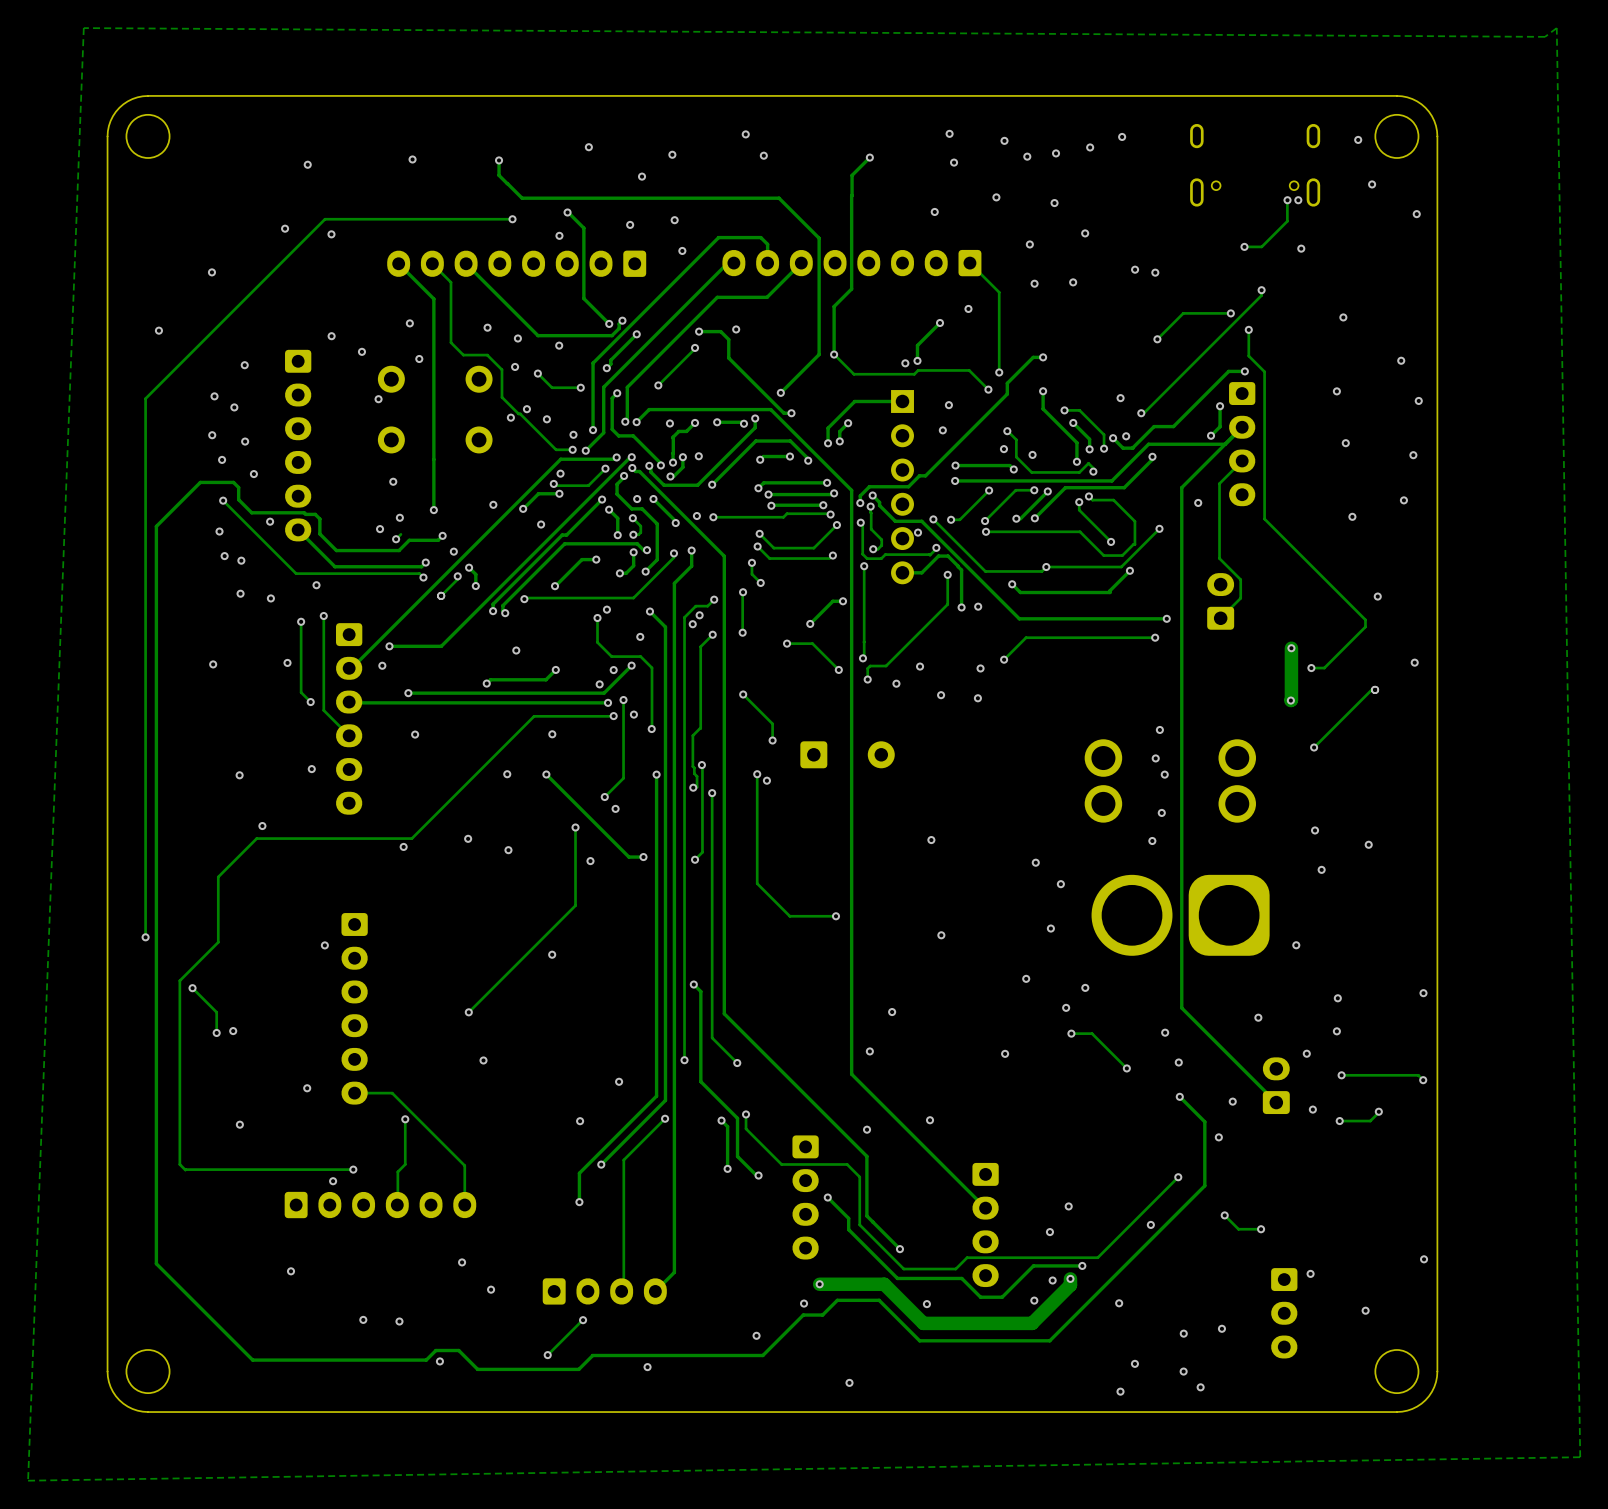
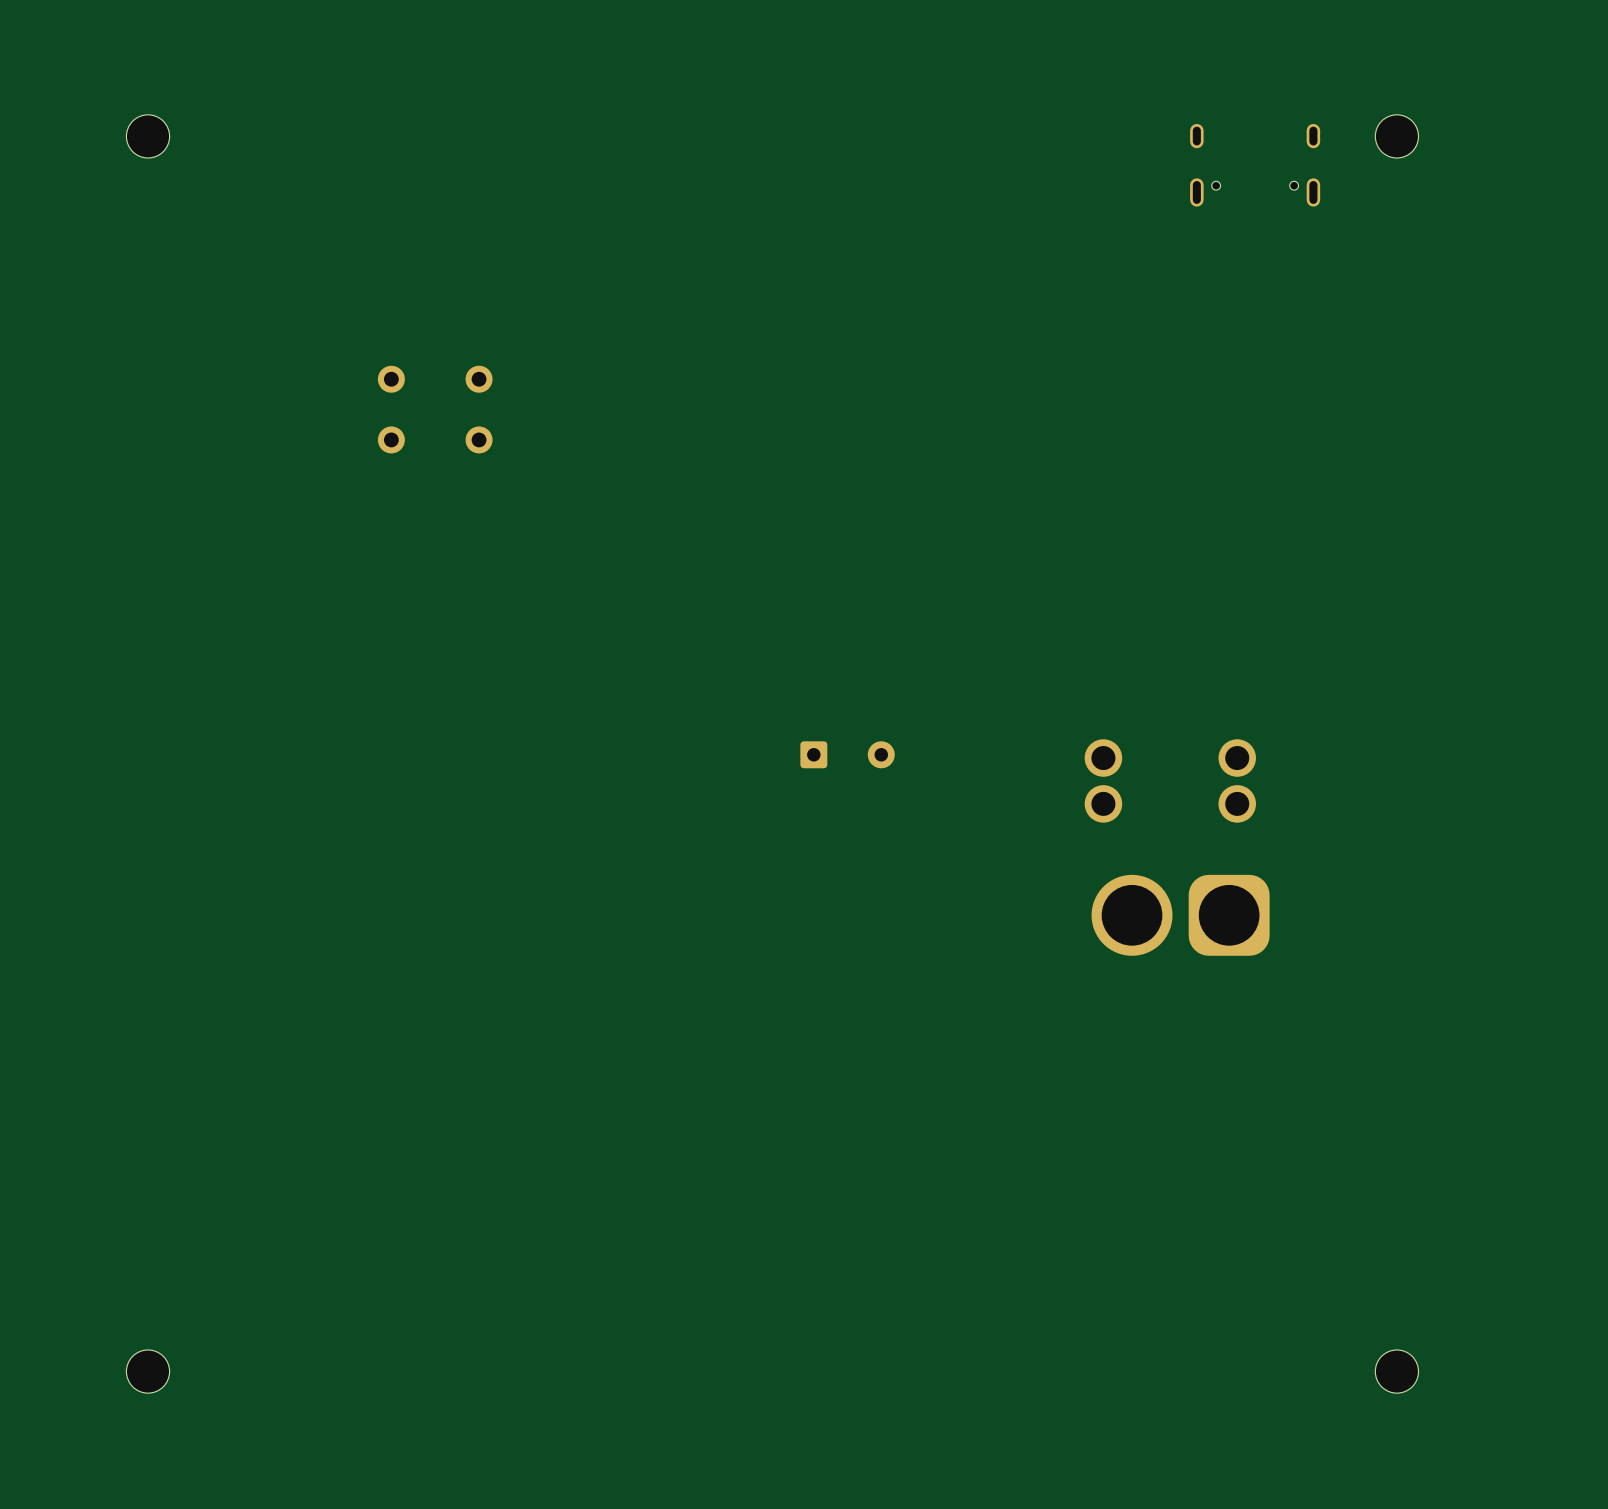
zone outline: (1556, 28) (1580, 1457) (28, 1480) (83, 28) (1545, 36) (1556, 28) -> none
board edge: (1396, 95) (148, 95) (132, 99) (119, 107) (110, 120) (107, 136) (107, 1371) (110, 1387) (119, 1400) (132, 1408) (148, 1412) (1396, 1412) (1412, 1408) (1425, 1400) (1434, 1387) (1437, 1371) (1437, 136) (1434, 120) (1425, 107) (1412, 99) (1396, 95) -> none
via: (949, 133) -> none
via: (745, 134) -> none
via: (1122, 136) -> none
via: (1358, 139) -> none
via: (1004, 140) -> none
via: (588, 147) -> none
via: (1090, 147) -> none
via: (1056, 153) -> none
via: (672, 154) -> none
via: (763, 155) -> none
via: (1027, 156) -> none
track: (869, 157) (852, 175) (851, 288) (834, 306) (834, 354) -> none
via: (869, 157) -> none
via: (412, 159) -> none
track: (499, 160) (499, 175) (507, 183) -> none
via: (499, 160) -> none
via: (954, 162) -> none
via: (307, 164) -> none
via: (642, 176) -> none
track: (507, 183) (522, 198) (779, 198) (819, 238) (819, 354) (780, 392) -> none
via: (1372, 184) -> none
via: (996, 197) -> none
track: (1287, 200) (1287, 221) (1261, 246) (1244, 246) -> none
via: (1287, 200) -> none
via: (1298, 200) -> none
via: (1054, 203) -> none
via: (934, 211) -> none
track: (567, 212) (583, 228) (583, 298) (609, 323) -> none
via: (567, 212) -> none
via: (1416, 214) -> none
track: (512, 219) (325, 219) (145, 398) (145, 937) -> none
via: (512, 219) -> none
via: (674, 220) -> none
via: (630, 224) -> none
via: (285, 228) -> none
via: (1085, 233) -> none
via: (331, 234) -> none
via: (559, 235) -> none
via: (1029, 244) -> none
via: (1244, 246) -> none
via: (1301, 248) -> none
via: (682, 250) -> none
track: (398, 263) (433, 298) (433, 510) -> none
track: (432, 263) (451, 282) (451, 342) (463, 355) (487, 355) (501, 369) (501, 397) (556, 449) (572, 449) -> none
track: (466, 263) (538, 335) (611, 335) (619, 328) (619, 323) (622, 320) -> none
part: (516, 263) -> none
track: (733, 263) (727, 263) (603, 387) (603, 432) (585, 450) -> none
track: (767, 263) (767, 244) (760, 237) (718, 237) (593, 363) (593, 430) -> none
track: (801, 263) (767, 297) (717, 297) (627, 387) (627, 419) (625, 421) -> none
part: (851, 263) -> none
track: (969, 263) (999, 292) (999, 372) -> none
via: (1135, 269) -> none
via: (211, 272) -> none
via: (1155, 272) -> none
via: (1073, 282) -> none
via: (1034, 283) -> none
track: (1261, 290) (1261, 295) (1143, 413) (1141, 413) -> none
via: (1261, 290) -> none
via: (968, 308) -> none
track: (1230, 313) (1183, 313) (1157, 339) -> none
via: (1230, 313) -> none
via: (1343, 317) -> none
via: (622, 320) -> none
track: (940, 322) (917, 345) (917, 360) -> none
via: (940, 322) -> none
via: (409, 323) -> none
via: (609, 323) -> none
via: (487, 327) -> none
via: (736, 329) -> none
track: (1248, 329) (1248, 356) (1264, 371) (1264, 518) (1365, 619) (1365, 626) (1324, 668) (1311, 668) -> none
via: (1248, 329) -> none
via: (158, 330) -> none
track: (699, 331) (720, 331) (728, 339) (728, 358) (783, 413) (791, 413) -> none
via: (699, 331) -> none
track: (636, 334) (610, 360) (610, 364) (606, 368) -> none
via: (636, 334) -> none
via: (331, 336) -> none
via: (517, 338) -> none
via: (1157, 339) -> none
via: (559, 345) -> none
track: (695, 347) (658, 385) -> none
via: (695, 347) -> none
via: (361, 351) -> none
track: (834, 354) (853, 374) (914, 374) (918, 370) (969, 370) (988, 389) -> none
via: (834, 354) -> none
track: (1043, 357) (1033, 357) (1007, 383) (1007, 394) (925, 475) (919, 475) (908, 486) (869, 486) (860, 495) (860, 503) -> none
via: (1043, 357) -> none
via: (419, 359) -> none
via: (917, 360) -> none
via: (1401, 360) -> none
via: (905, 363) -> none
via: (244, 365) -> none
via: (515, 366) -> none
via: (606, 368) -> none
track: (1244, 371) (1228, 371) (1173, 426) (1154, 426) (1132, 448) (1123, 448) (1113, 438) -> none
via: (1244, 371) -> none
via: (999, 372) -> none
track: (537, 373) (552, 387) (580, 387) -> none
via: (537, 373) -> none
via: (658, 385) -> none
via: (580, 387) -> none
via: (988, 389) -> none
track: (1043, 391) (1043, 408) (1076, 442) (1076, 461) -> none
via: (1043, 391) -> none
via: (1336, 391) -> none
via: (780, 392) -> none
track: (617, 393) (612, 398) (612, 429) (618, 435) (633, 435) (660, 465) -> none
via: (617, 393) -> none
via: (214, 396) -> none
via: (1120, 398) -> none
via: (378, 399) -> none
via: (1418, 400) -> none
track: (902, 401) (854, 401) (828, 428) (828, 443) -> none
via: (948, 405) -> none
track: (1220, 406) (1220, 426) (1211, 435) -> none
via: (1220, 406) -> none
via: (234, 407) -> none
via: (526, 409) -> none
track: (1064, 410) (1079, 410) (1104, 434) (1104, 448) -> none
via: (1064, 410) -> none
via: (791, 413) -> none
via: (1141, 413) -> none
via: (510, 417) -> none
track: (755, 418) (755, 427) (697, 485) (664, 485) (650, 472) (649, 465) -> none
via: (755, 418) -> none
via: (546, 419) -> none
via: (625, 421) -> none
track: (636, 422) (649, 409) (770, 409) (851, 490) (851, 1074) (985, 1208) -> none
via: (636, 422) -> none
track: (695, 422) (686, 431) (678, 431) (673, 437) (673, 462) -> none
via: (695, 422) -> none
track: (717, 422) (744, 423) -> none
via: (717, 422) -> none
track: (1073, 422) (1089, 439) (1089, 449) -> none
via: (1073, 422) -> none
via: (669, 423) -> none
via: (744, 423) -> none
track: (848, 423) (839, 431) (839, 441) -> none
via: (848, 423) -> none
track: (1242, 427) (1181, 487) (1181, 1008) (1276, 1102) -> none
via: (593, 430) -> none
via: (942, 430) -> none
track: (1007, 431) (1016, 439) (1016, 457) (1031, 472) (1079, 472) (1088, 463) (1093, 468) (1093, 471) -> none
via: (1007, 431) -> none
via: (573, 434) -> none
via: (212, 435) -> none
via: (1211, 435) -> none
via: (1126, 436) -> none
via: (1113, 438) -> none
via: (245, 441) -> none
via: (839, 441) -> none
via: (828, 443) -> none
via: (1345, 443) -> none
track: (1225, 444) (1148, 444) (1111, 480) (955, 480) -> none
part: (1242, 444) -> none
part: (298, 445) -> none
via: (1104, 448) -> none
via: (572, 449) -> none
via: (1003, 449) -> none
via: (1089, 449) -> none
via: (585, 450) -> none
via: (1032, 454) -> none
via: (1413, 455) -> none
via: (698, 456) -> none
track: (790, 456) (763, 456) (760, 459) -> none
via: (790, 456) -> none
track: (1152, 456) (1152, 459) (1124, 487) (1065, 487) (1034, 518) -> none
via: (1152, 456) -> none
track: (616, 457) (614, 459) (560, 459) (351, 668) (349, 668) -> none
via: (616, 457) -> none
track: (631, 457) (441, 646) (389, 646) -> none
via: (631, 457) -> none
track: (682, 457) (682, 467) (673, 476) (670, 476) -> none
via: (682, 457) -> none
via: (222, 459) -> none
via: (760, 459) -> none
track: (808, 460) (790, 441) (755, 441) (712, 484) -> none
via: (808, 460) -> none
track: (1242, 460) (1219, 483) (1219, 558) (1240, 579) (1240, 598) (1220, 618) -> none
via: (1076, 461) -> none
via: (673, 462) -> none
via: (649, 465) -> none
via: (660, 465) -> none
track: (955, 465) (1009, 465) (1013, 469) -> none
via: (955, 465) -> none
track: (605, 468) (588, 485) (555, 485) (553, 483) -> none
via: (605, 468) -> none
track: (632, 468) (635, 471) (639, 471) (724, 556) (724, 1013) (866, 1156) (866, 1216) (899, 1249) -> none
via: (632, 468) -> none
via: (1013, 469) -> none
via: (1093, 471) -> none
via: (560, 473) -> none
via: (253, 474) -> none
track: (624, 475) (617, 484) (617, 494) (631, 508) (642, 508) (657, 523) (657, 559) (645, 571) -> none
via: (624, 475) -> none
via: (670, 476) -> none
via: (955, 480) -> none
via: (393, 481) -> none
track: (827, 482) (763, 482) (758, 488) -> none
via: (827, 482) -> none
via: (553, 483) -> none
via: (712, 484) -> none
part: (902, 487) -> none
via: (758, 488) -> none
track: (989, 490) (959, 519) (951, 519) -> none
via: (989, 490) -> none
track: (1034, 490) (1015, 490) (985, 521) -> none
via: (1034, 490) -> none
track: (1047, 491) (1020, 518) (1016, 518) -> none
via: (1047, 491) -> none
track: (559, 493) (538, 493) (523, 508) -> none
via: (559, 493) -> none
track: (834, 493) (768, 494) -> none
via: (834, 493) -> none
via: (768, 494) -> none
track: (872, 495) (895, 521) (921, 521) (1019, 618) (1166, 618) -> none
via: (872, 495) -> none
track: (1088, 496) (1092, 500) (1113, 500) (1134, 521) (1134, 544) (1122, 555) (1103, 555) (1080, 531) (986, 531) -> none
via: (1088, 496) -> none
track: (602, 499) (566, 535) (562, 535) (493, 604) (493, 611) -> none
via: (602, 499) -> none
via: (637, 499) -> none
track: (653, 499) (675, 523) -> none
via: (653, 499) -> none
track: (223, 500) (296, 573) (419, 573) (423, 577) -> none
via: (223, 500) -> none
via: (1403, 500) -> none
track: (1079, 502) (1079, 510) (1111, 541) -> none
via: (1079, 502) -> none
via: (1198, 502) -> none
via: (860, 503) -> none
via: (493, 504) -> none
via: (771, 505) -> none
track: (823, 505) (771, 505) -> none
via: (823, 505) -> none
track: (870, 506) (871, 529) (881, 539) (881, 545) (877, 549) (873, 549) -> none
via: (870, 506) -> none
via: (523, 508) -> none
track: (609, 509) (617, 518) (617, 535) -> none
via: (609, 509) -> none
via: (433, 510) -> none
track: (830, 514) (787, 513) (783, 517) (713, 517) -> none
via: (830, 514) -> none
via: (696, 516) -> none
via: (1352, 516) -> none
via: (399, 517) -> none
via: (713, 517) -> none
track: (632, 518) (640, 526) (640, 532) (638, 534) (633, 534) -> none
via: (632, 518) -> none
via: (1016, 518) -> none
via: (1034, 518) -> none
track: (933, 519) (985, 571) (1041, 571) (1046, 567) (1121, 567) (1159, 528) -> none
via: (933, 519) -> none
via: (951, 519) -> none
via: (270, 521) -> none
via: (985, 521) -> none
track: (860, 522) (862, 524) (862, 554) (867, 558) (881, 558) (885, 554) (930, 555) (936, 547) -> none
via: (860, 522) -> none
via: (675, 523) -> none
via: (541, 524) -> none
track: (836, 525) (813, 548) (773, 548) (759, 533) -> none
via: (836, 525) -> none
via: (1159, 528) -> none
track: (298, 529) (334, 566) (421, 566) (425, 562) -> none
via: (380, 529) -> none
via: (219, 531) -> none
via: (986, 531) -> none
via: (918, 532) -> none
via: (759, 533) -> none
track: (400, 534) (396, 539) -> none
via: (633, 534) -> none
track: (442, 535) (438, 540) (409, 540) (399, 550) (336, 550) (319, 533) (319, 518) (315, 514) (251, 512) (238, 499) (238, 487) (233, 482) (200, 482) (156, 526) (156, 1263) (252, 1360) (426, 1360) (435, 1350) (458, 1350) (477, 1369) (578, 1369) (592, 1355) (762, 1355) (803, 1315) (822, 1315) (837, 1300) (879, 1300) (919, 1340) (1049, 1340) (1204, 1185) (1204, 1121) (1179, 1096) -> none
via: (442, 535) -> none
via: (617, 535) -> none
via: (396, 539) -> none
via: (1111, 541) -> none
track: (757, 546) (769, 558) (829, 558) -> none
via: (757, 546) -> none
via: (936, 547) -> none
via: (873, 549) -> none
track: (647, 550) (643, 550) (637, 543) (564, 543) (502, 605) (502, 610) (505, 613) -> none
via: (647, 550) -> none
track: (691, 550) (691, 566) (674, 583) (674, 1272) (655, 1291) -> none
via: (691, 550) -> none
via: (453, 551) -> none
track: (633, 552) (633, 565) (626, 573) (619, 573) -> none
via: (633, 552) -> none
track: (673, 553) (673, 557) (633, 598) (524, 599) -> none
via: (673, 553) -> none
via: (832, 555) -> none
via: (224, 556) -> none
track: (596, 559) (581, 559) (555, 586) -> none
via: (596, 559) -> none
via: (241, 560) -> none
via: (425, 562) -> none
track: (751, 562) (751, 574) (760, 582) -> none
via: (751, 562) -> none
track: (864, 566) (862, 658) -> none
via: (864, 566) -> none
track: (469, 567) (475, 574) (475, 586) -> none
via: (469, 567) -> none
via: (1046, 567) -> none
track: (1129, 570) (1109, 592) (1020, 592) (1012, 584) -> none
via: (1129, 570) -> none
via: (645, 571) -> none
track: (902, 572) (921, 572) (938, 556) (948, 556) (961, 570) (961, 607) -> none
via: (619, 573) -> none
track: (947, 574) (947, 604) (886, 666) (870, 666) (867, 668) (867, 679) -> none
via: (947, 574) -> none
track: (457, 576) (457, 579) (441, 595) -> none
via: (457, 576) -> none
via: (423, 577) -> none
via: (760, 582) -> none
via: (1012, 584) -> none
via: (316, 585) -> none
via: (475, 586) -> none
via: (555, 586) -> none
track: (743, 592) (742, 632) -> none
via: (743, 592) -> none
via: (240, 593) -> none
via: (441, 595) -> none
via: (1377, 596) -> none
via: (270, 598) -> none
via: (524, 599) -> none
track: (714, 599) (707, 606) (695, 606) (684, 617) (684, 1060) -> none
via: (714, 599) -> none
track: (843, 601) (832, 601) (810, 623) -> none
via: (843, 601) -> none
part: (1220, 601) -> none
via: (978, 606) -> none
via: (961, 607) -> none
via: (606, 609) -> none
via: (493, 611) -> none
track: (649, 611) (665, 627) (665, 1100) (601, 1164) -> none
via: (649, 611) -> none
via: (505, 613) -> none
track: (323, 615) (323, 710) (349, 735) -> none
via: (323, 615) -> none
via: (699, 615) -> none
track: (597, 618) (597, 642) (611, 656) (640, 656) (652, 667) (651, 729) -> none
via: (597, 618) -> none
via: (1166, 618) -> none
track: (301, 621) (301, 692) (310, 702) -> none
via: (301, 621) -> none
via: (810, 623) -> none
via: (692, 624) -> none
via: (742, 632) -> none
track: (712, 634) (700, 646) (700, 728) (692, 735) (692, 766) (697, 776) (697, 787) (693, 787) -> none
via: (712, 634) -> none
via: (640, 636) -> none
track: (1155, 637) (1026, 637) (1004, 659) -> none
via: (1155, 637) -> none
track: (787, 643) (812, 643) (838, 669) -> none
via: (787, 643) -> none
via: (389, 646) -> none
track: (1291, 648) (1290, 700) -> none
via: (1291, 648) -> none
via: (516, 650) -> none
via: (862, 658) -> none
via: (1004, 659) -> none
via: (287, 662) -> none
via: (1414, 662) -> none
via: (213, 664) -> none
via: (382, 665) -> none
track: (631, 665) (604, 693) (408, 693) -> none
via: (631, 665) -> none
via: (920, 666) -> none
via: (980, 668) -> none
via: (1311, 668) -> none
track: (555, 669) (545, 679) (490, 679) (486, 683) -> none
via: (555, 669) -> none
via: (838, 669) -> none
via: (613, 670) -> none
via: (867, 679) -> none
via: (486, 683) -> none
via: (896, 683) -> none
via: (599, 684) -> none
track: (1375, 689) (1371, 689) (1314, 747) -> none
via: (1375, 689) -> none
via: (408, 693) -> none
track: (743, 694) (772, 723) (772, 740) -> none
via: (743, 694) -> none
via: (941, 695) -> none
via: (977, 698) -> none
track: (623, 700) (623, 778) (604, 797) -> none
via: (623, 700) -> none
via: (1290, 700) -> none
via: (310, 702) -> none
track: (349, 702) (608, 702) -> none
via: (608, 702) -> none
via: (633, 714) -> none
track: (613, 716) (534, 716) (411, 838) (256, 838) (218, 877) (218, 942) (179, 980) (179, 1164) (185, 1170) (353, 1169) -> none
via: (613, 716) -> none
part: (349, 718) -> none
via: (651, 729) -> none
via: (1159, 729) -> none
via: (415, 734) -> none
via: (552, 734) -> none
via: (772, 740) -> none
via: (1314, 747) -> none
via: (1155, 758) -> none
track: (701, 765) (702, 852) (695, 859) -> none
via: (701, 765) -> none
via: (311, 769) -> none
via: (507, 774) -> none
track: (546, 774) (628, 857) (643, 857) -> none
via: (546, 774) -> none
track: (656, 774) (656, 1096) (579, 1173) (579, 1202) -> none
via: (656, 774) -> none
track: (757, 774) (757, 883) (789, 916) (836, 916) -> none
via: (757, 774) -> none
via: (1164, 774) -> none
via: (239, 775) -> none
via: (766, 780) -> none
via: (693, 787) -> none
track: (712, 793) (712, 1037) (737, 1063) -> none
via: (712, 793) -> none
via: (604, 797) -> none
via: (615, 808) -> none
via: (1161, 812) -> none
via: (262, 826) -> none
track: (575, 827) (575, 905) (468, 1012) -> none
via: (575, 827) -> none
via: (1315, 830) -> none
via: (468, 838) -> none
via: (931, 840) -> none
via: (1152, 840) -> none
via: (1368, 844) -> none
via: (403, 846) -> none
via: (508, 850) -> none
via: (643, 857) -> none
via: (695, 859) -> none
via: (590, 861) -> none
via: (1035, 862) -> none
via: (1321, 869) -> none
via: (1060, 884) -> none
via: (836, 916) -> none
via: (1050, 928) -> none
via: (941, 935) -> none
via: (145, 937) -> none
via: (324, 945) -> none
via: (1296, 945) -> none
via: (552, 954) -> none
via: (1026, 978) -> none
track: (693, 984) (700, 991) (700, 1081) (737, 1118) (737, 1156) (758, 1175) -> none
via: (693, 984) -> none
via: (1085, 987) -> none
track: (192, 988) (216, 1012) (216, 1032) -> none
via: (192, 988) -> none
via: (1423, 993) -> none
via: (1337, 998) -> none
via: (1066, 1007) -> none
part: (354, 1008) -> none
via: (468, 1012) -> none
via: (892, 1012) -> none
via: (1258, 1017) -> none
via: (233, 1031) -> none
via: (1336, 1031) -> none
via: (216, 1032) -> none
via: (1165, 1032) -> none
track: (1071, 1033) (1092, 1033) (1126, 1068) -> none
via: (1071, 1033) -> none
via: (869, 1051) -> none
via: (1005, 1053) -> none
via: (1306, 1053) -> none
via: (483, 1060) -> none
via: (684, 1060) -> none
via: (1178, 1062) -> none
via: (737, 1063) -> none
via: (1126, 1068) -> none
track: (1341, 1075) (1418, 1075) (1423, 1080) -> none
via: (1341, 1075) -> none
via: (1423, 1080) -> none
via: (619, 1081) -> none
part: (1276, 1085) -> none
via: (307, 1088) -> none
track: (354, 1093) (392, 1093) (464, 1165) (464, 1205) -> none
via: (1179, 1096) -> none
via: (1232, 1101) -> none
via: (1312, 1109) -> none
track: (1378, 1111) (1370, 1121) (1339, 1121) -> none
via: (1378, 1111) -> none
track: (746, 1114) (746, 1128) (781, 1164) (847, 1164) (859, 1177) (859, 1224) (903, 1269) (955, 1269) (967, 1257) (1097, 1257) (1178, 1177) -> none
via: (746, 1114) -> none
track: (665, 1118) (623, 1160) (623, 1292) -> none
via: (665, 1118) -> none
track: (405, 1119) (405, 1164) (397, 1171) (397, 1205) -> none
via: (405, 1119) -> none
track: (721, 1120) (727, 1126) (727, 1168) -> none
via: (721, 1120) -> none
via: (930, 1120) -> none
via: (580, 1121) -> none
via: (1339, 1121) -> none
via: (239, 1124) -> none
via: (867, 1129) -> none
via: (1218, 1137) -> none
via: (601, 1164) -> none
via: (727, 1168) -> none
via: (353, 1169) -> none
via: (758, 1175) -> none
via: (1178, 1177) -> none
via: (333, 1181) -> none
part: (805, 1197) -> none
track: (827, 1197) (848, 1218) (848, 1229) (897, 1278) (961, 1278) (980, 1297) (1002, 1297) (1033, 1265) (1082, 1265) -> none
via: (827, 1197) -> none
via: (579, 1202) -> none
part: (380, 1205) -> none
via: (1068, 1206) -> none
track: (1224, 1215) (1238, 1229) (1261, 1229) -> none
via: (1224, 1215) -> none
part: (985, 1224) -> none
via: (1150, 1224) -> none
via: (1261, 1229) -> none
via: (1049, 1232) -> none
via: (899, 1249) -> none
via: (1424, 1259) -> none
via: (462, 1262) -> none
via: (1082, 1265) -> none
via: (291, 1271) -> none
via: (1310, 1273) -> none
track: (1070, 1278) (1070, 1285) (1032, 1323) (923, 1323) (884, 1284) (819, 1284) -> none
via: (1070, 1278) -> none
via: (1052, 1280) -> none
via: (819, 1284) -> none
via: (491, 1289) -> none
part: (604, 1291) -> none
via: (1034, 1300) -> none
via: (804, 1303) -> none
via: (1119, 1303) -> none
via: (926, 1304) -> none
via: (1365, 1310) -> none
part: (1284, 1313) -> none
via: (363, 1319) -> none
track: (583, 1320) (547, 1355) -> none
via: (583, 1320) -> none
via: (399, 1321) -> none
via: (1221, 1328) -> none
via: (1183, 1333) -> none
via: (756, 1335) -> none
via: (547, 1355) -> none
via: (439, 1361) -> none
via: (1134, 1363) -> none
via: (647, 1367) -> none
via: (1183, 1371) -> none
via: (849, 1382) -> none
via: (1200, 1387) -> none
via: (1120, 1391) -> none

